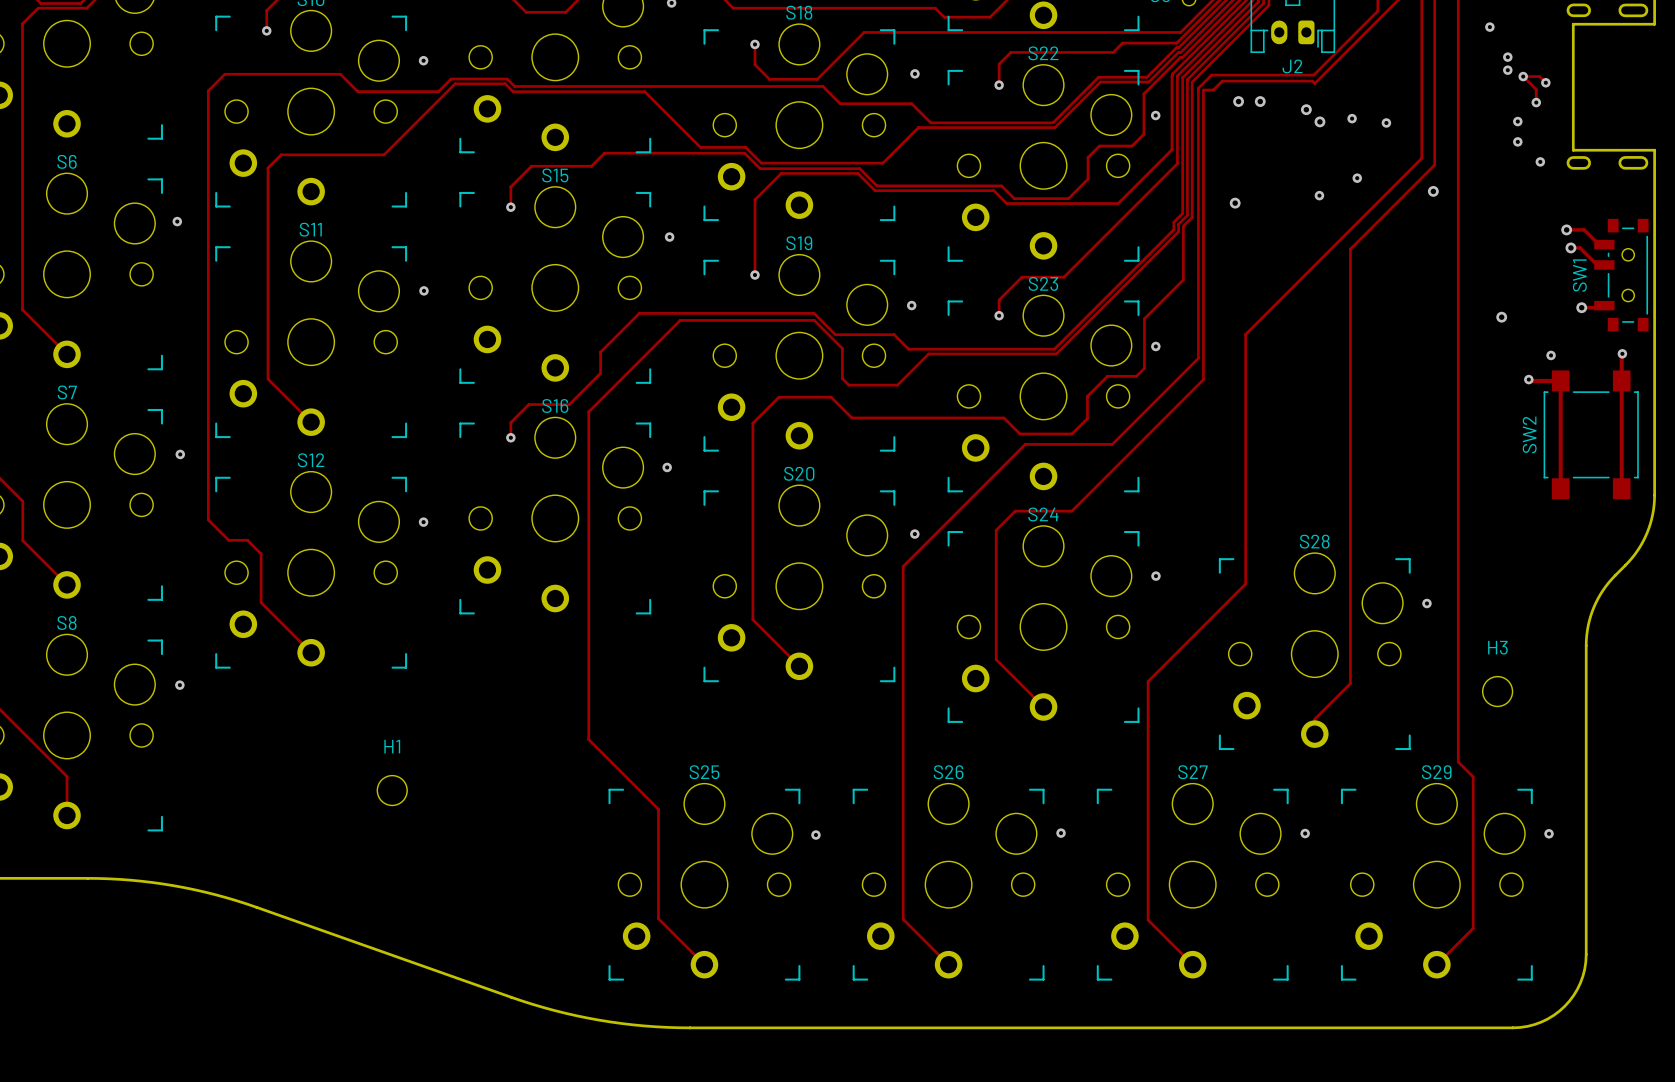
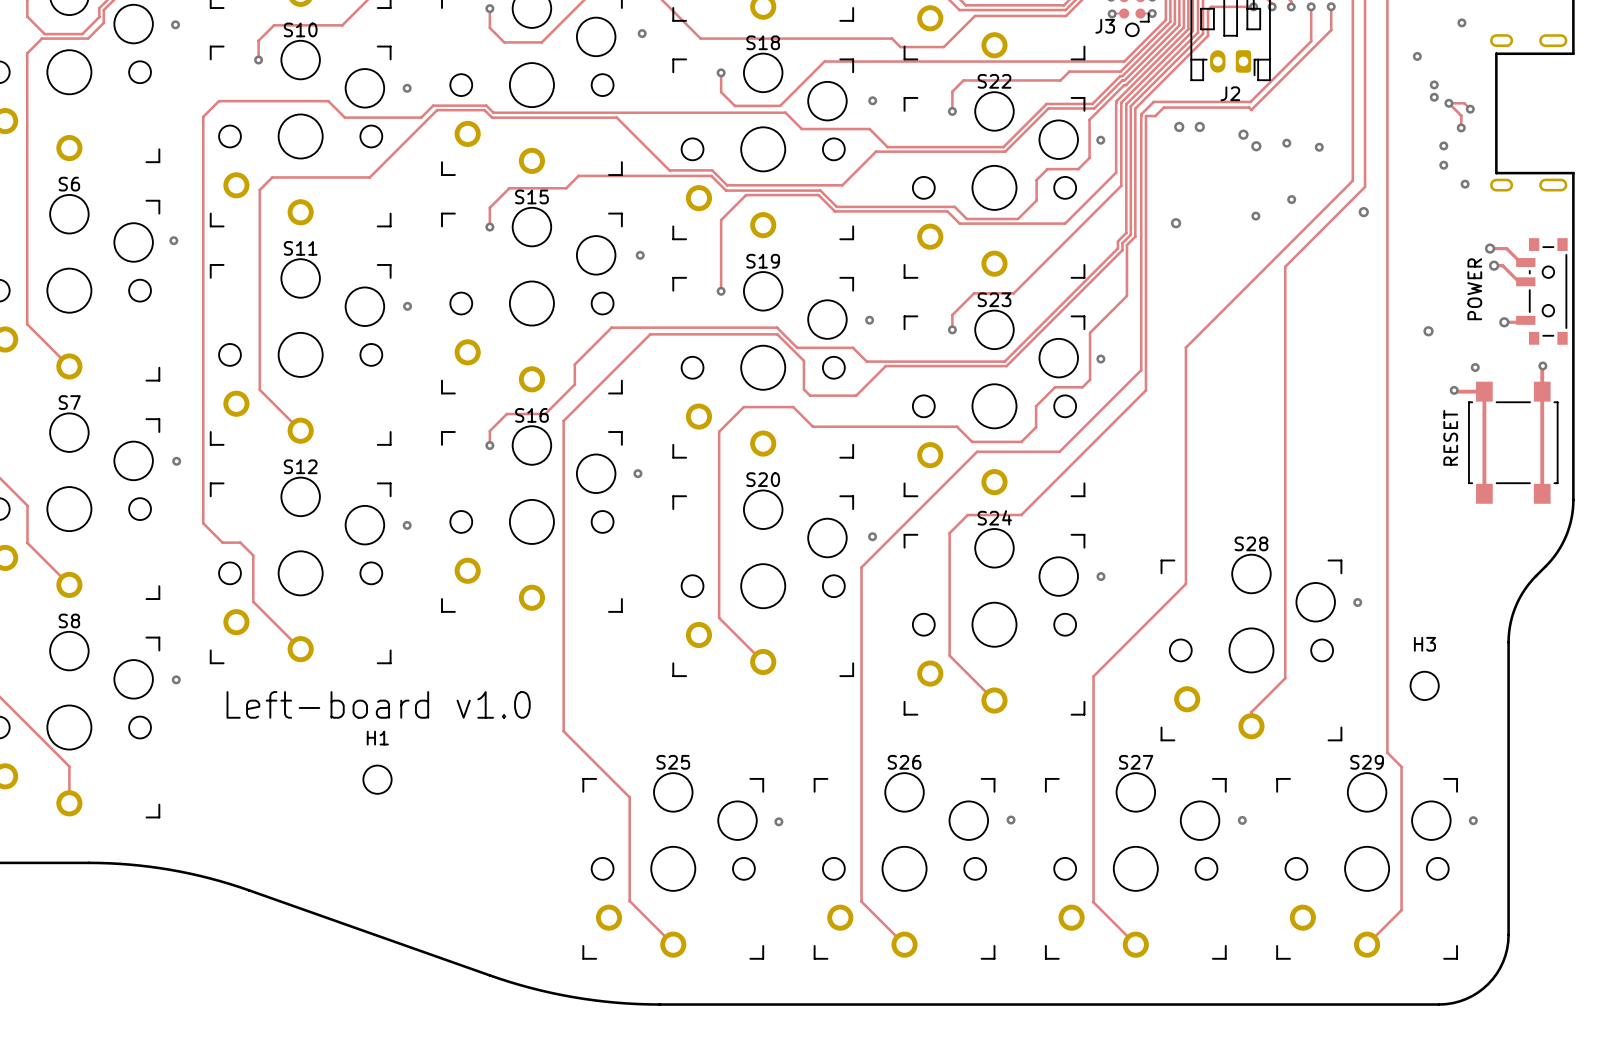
SW1 name: SW1 (1579, 275) -> none
text: none -> POWER (1474, 289)
text: none -> RESET (1450, 437)
SW2 name: SW2 (1529, 434) -> none
text: none -> Left-board v1.0 (378, 704)

